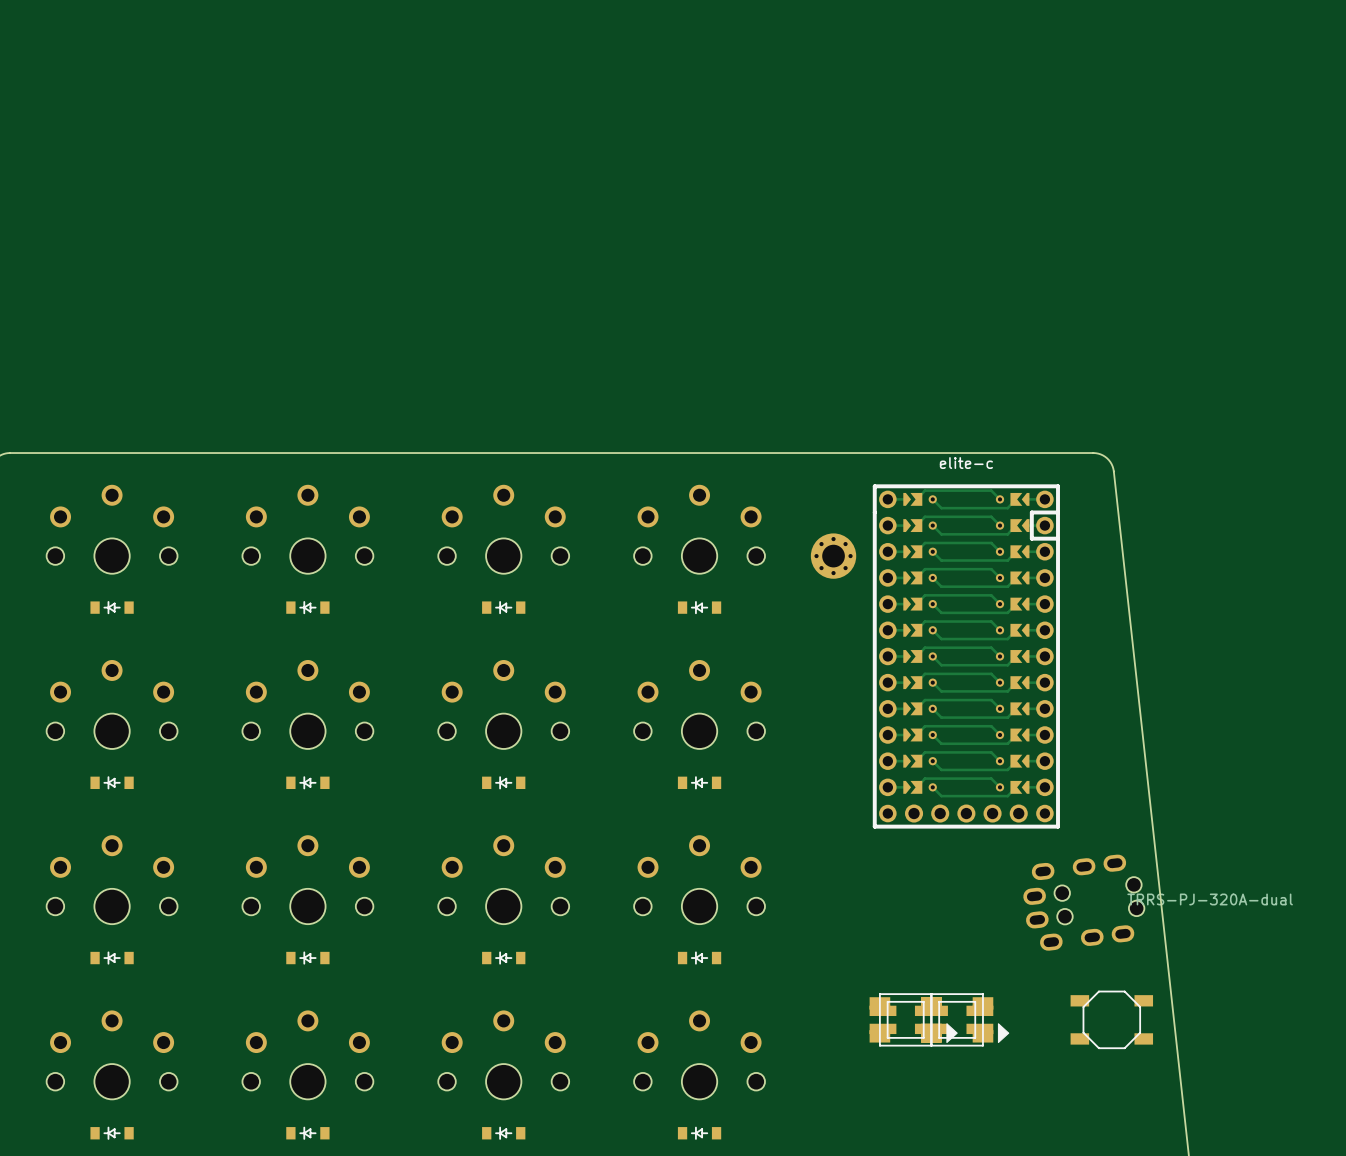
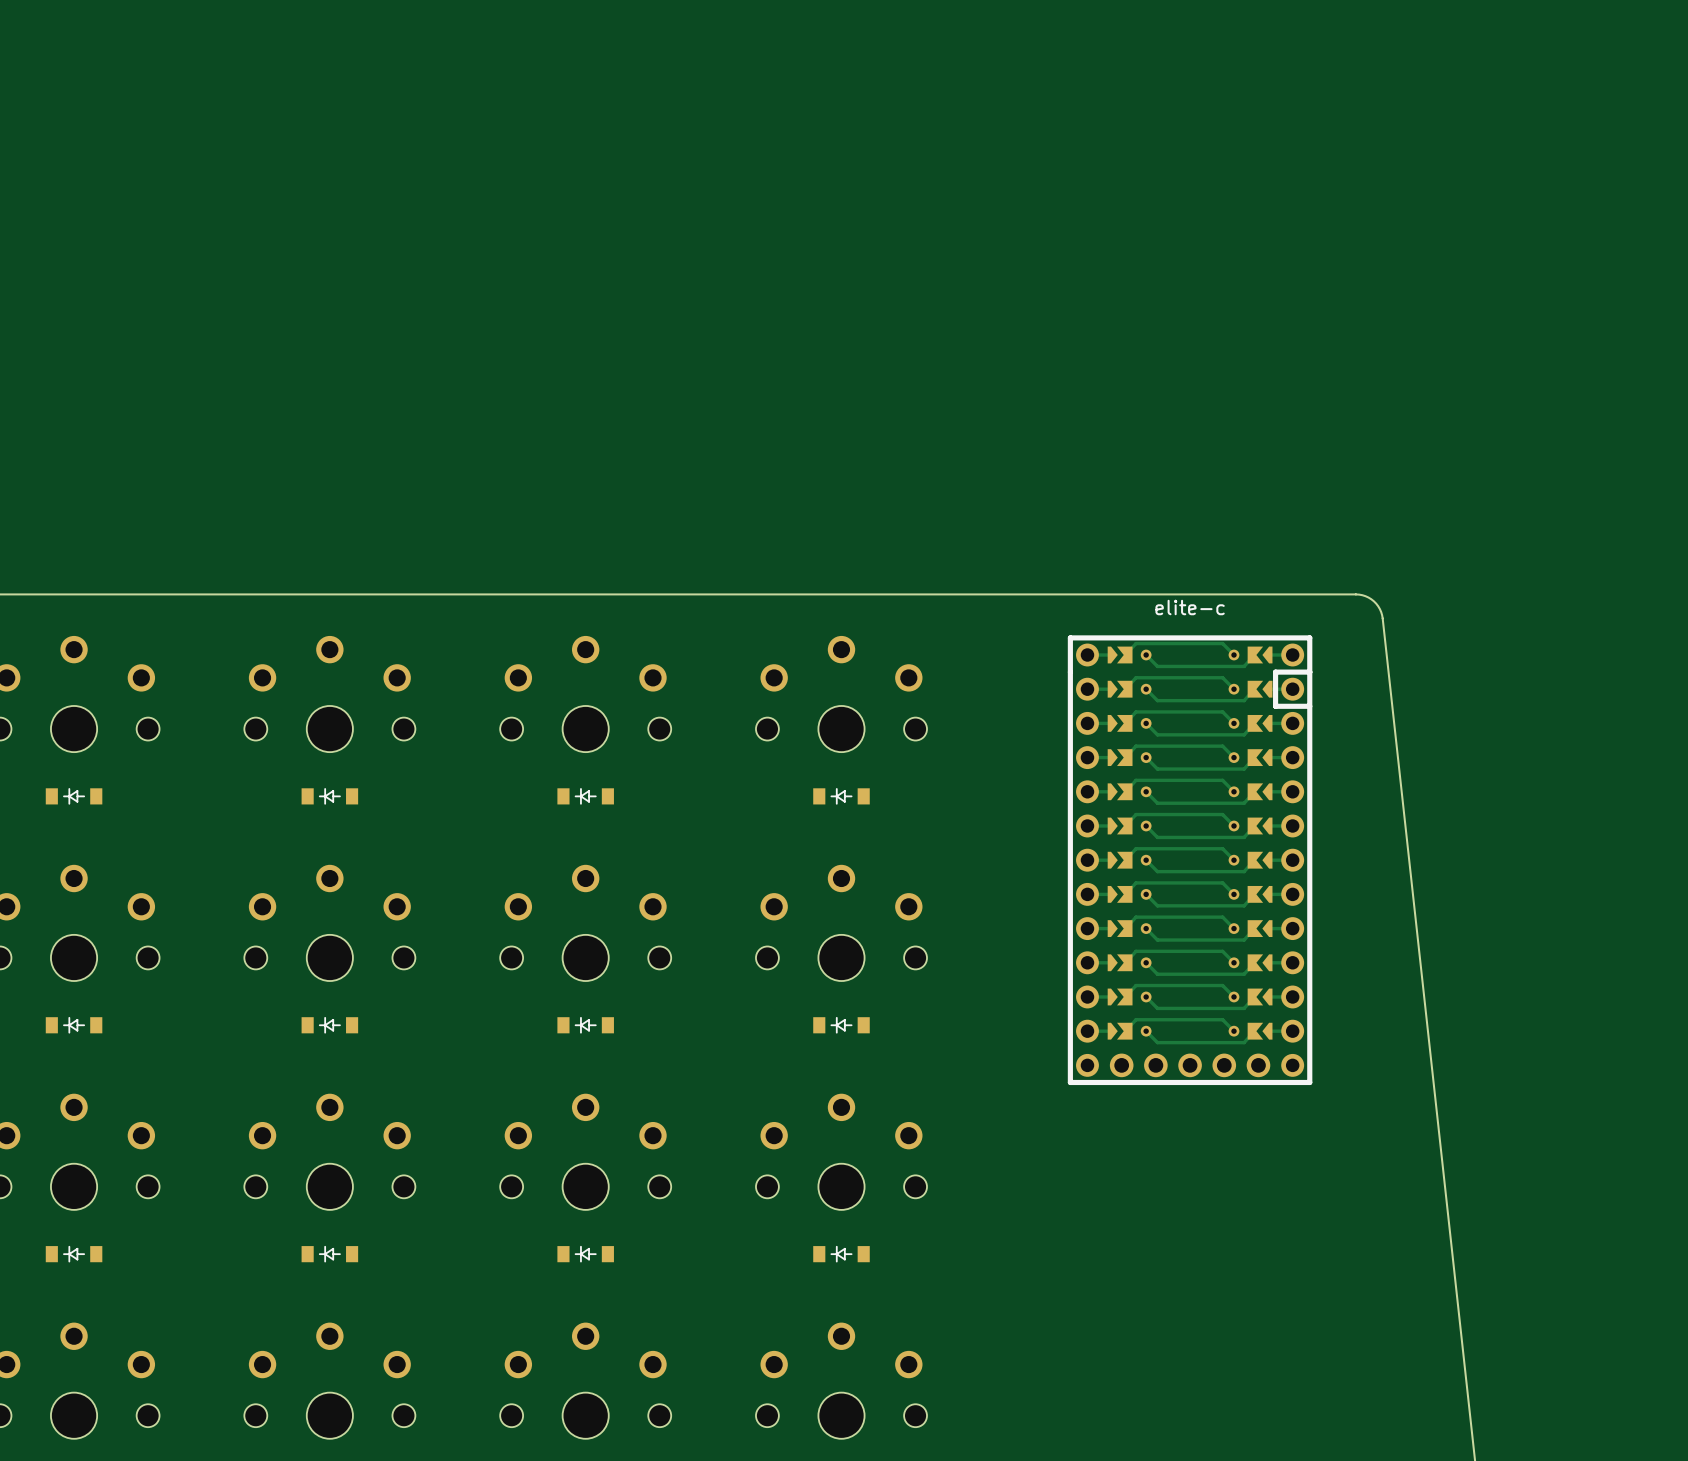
part: (833, 556) -> none
part: TRRS-PJ-320A-dual (1083, 902) -> none
part: (913, 1019) -> none
part: (965, 1019) -> none
part: (1111, 1019) -> none

